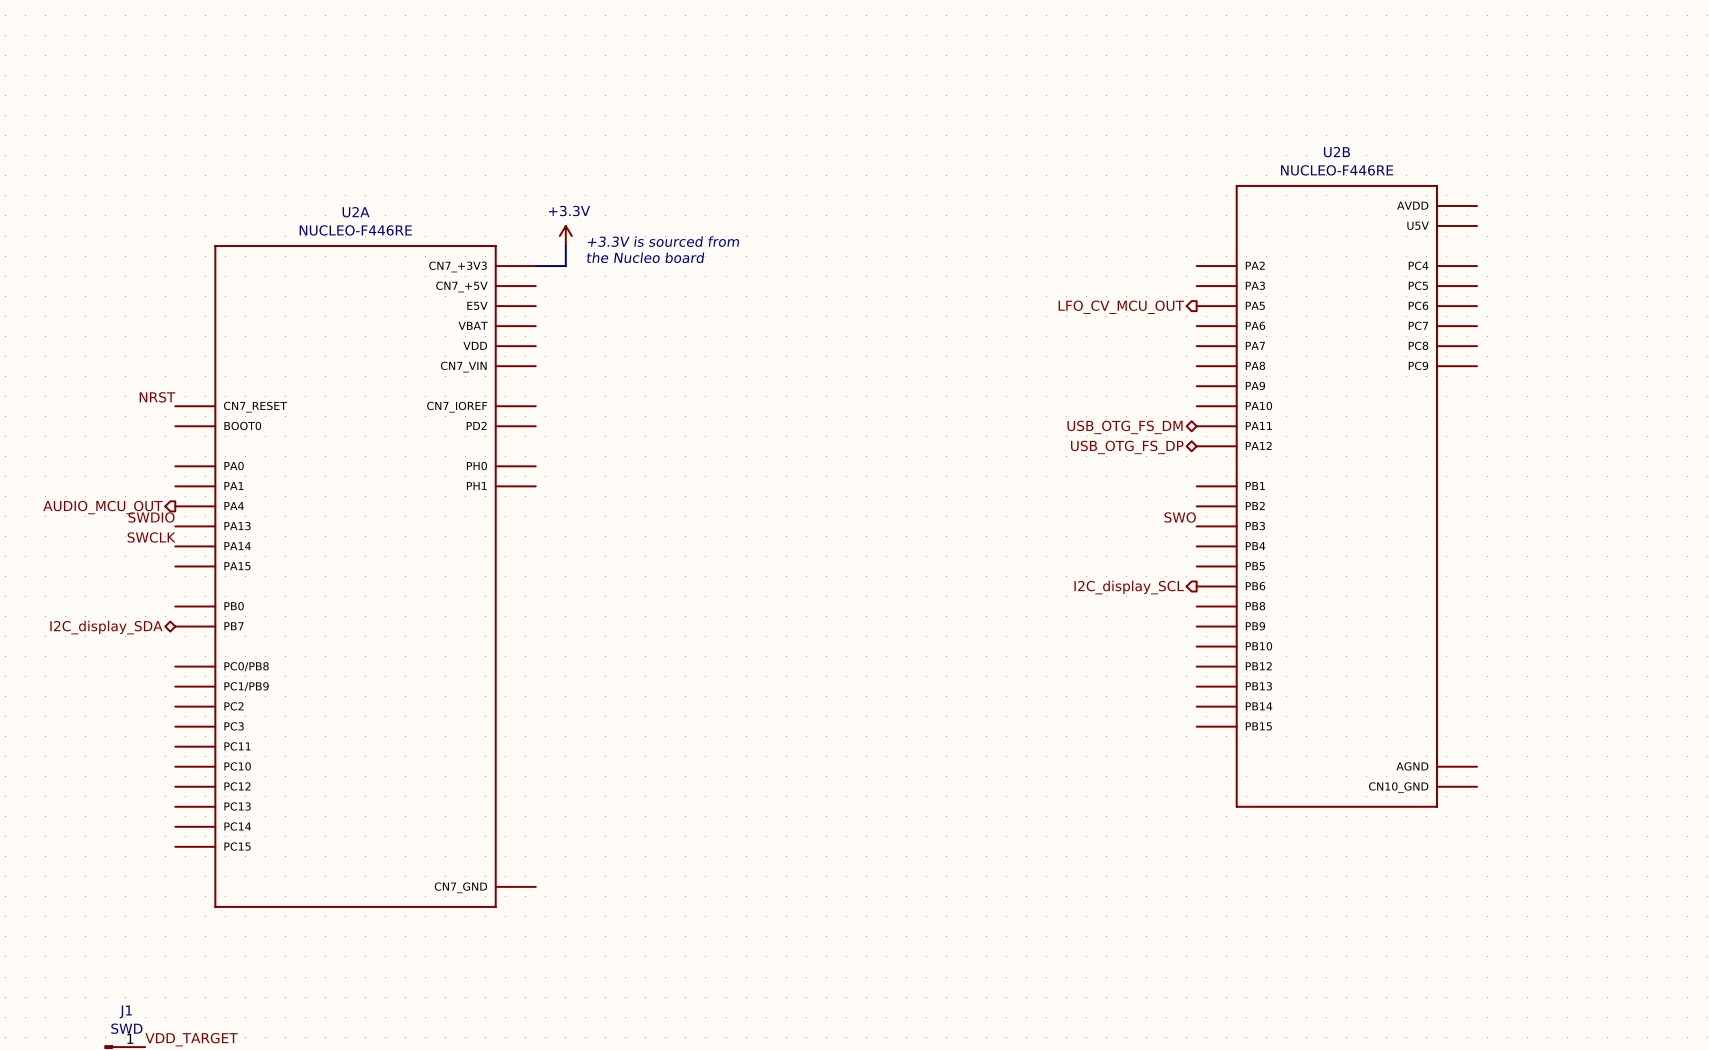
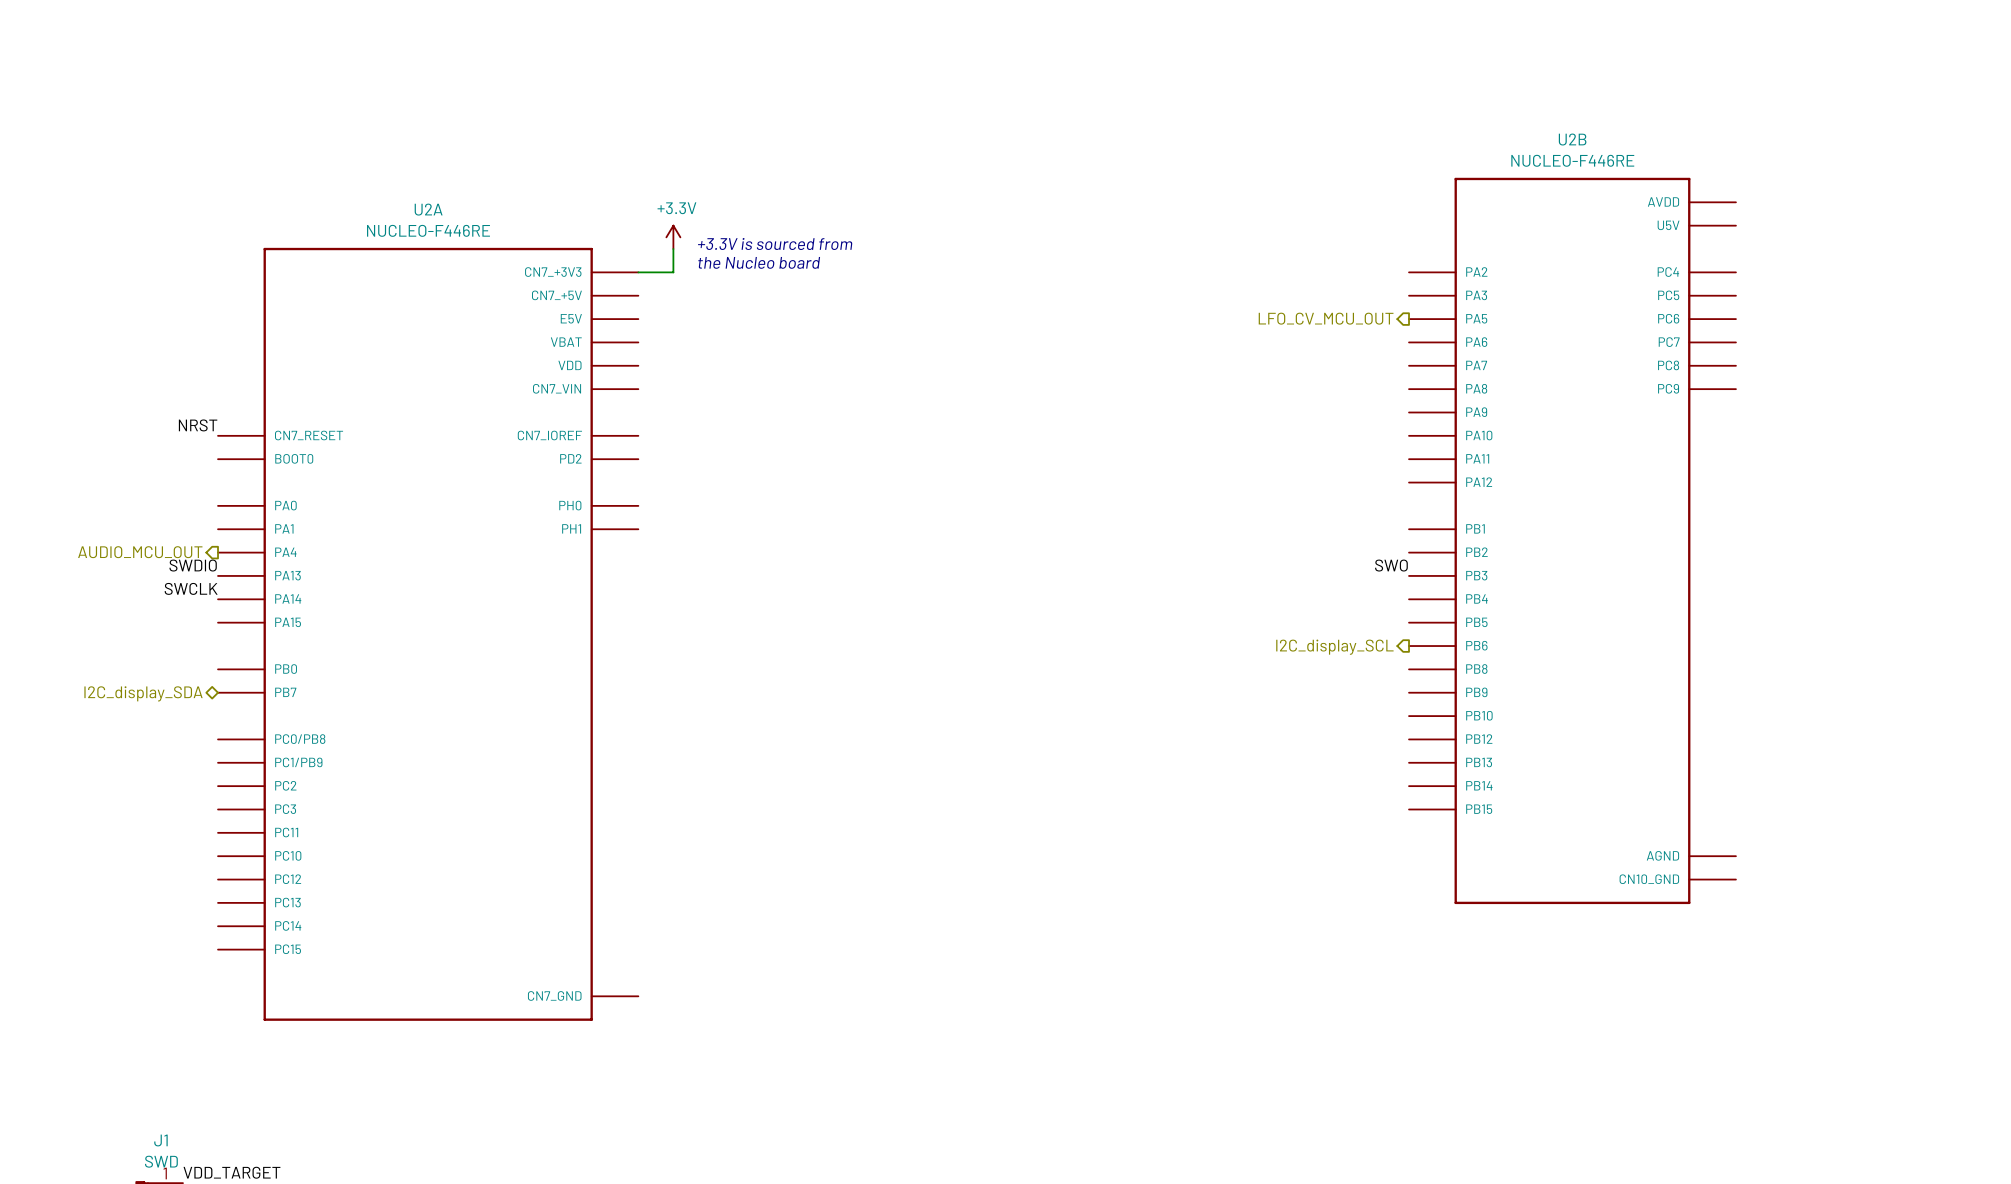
hierarchical label: USB_OTG_FS_DM (1125, 427) -> none
hierarchical label: USB_OTG_FS_DP (1127, 447) -> none

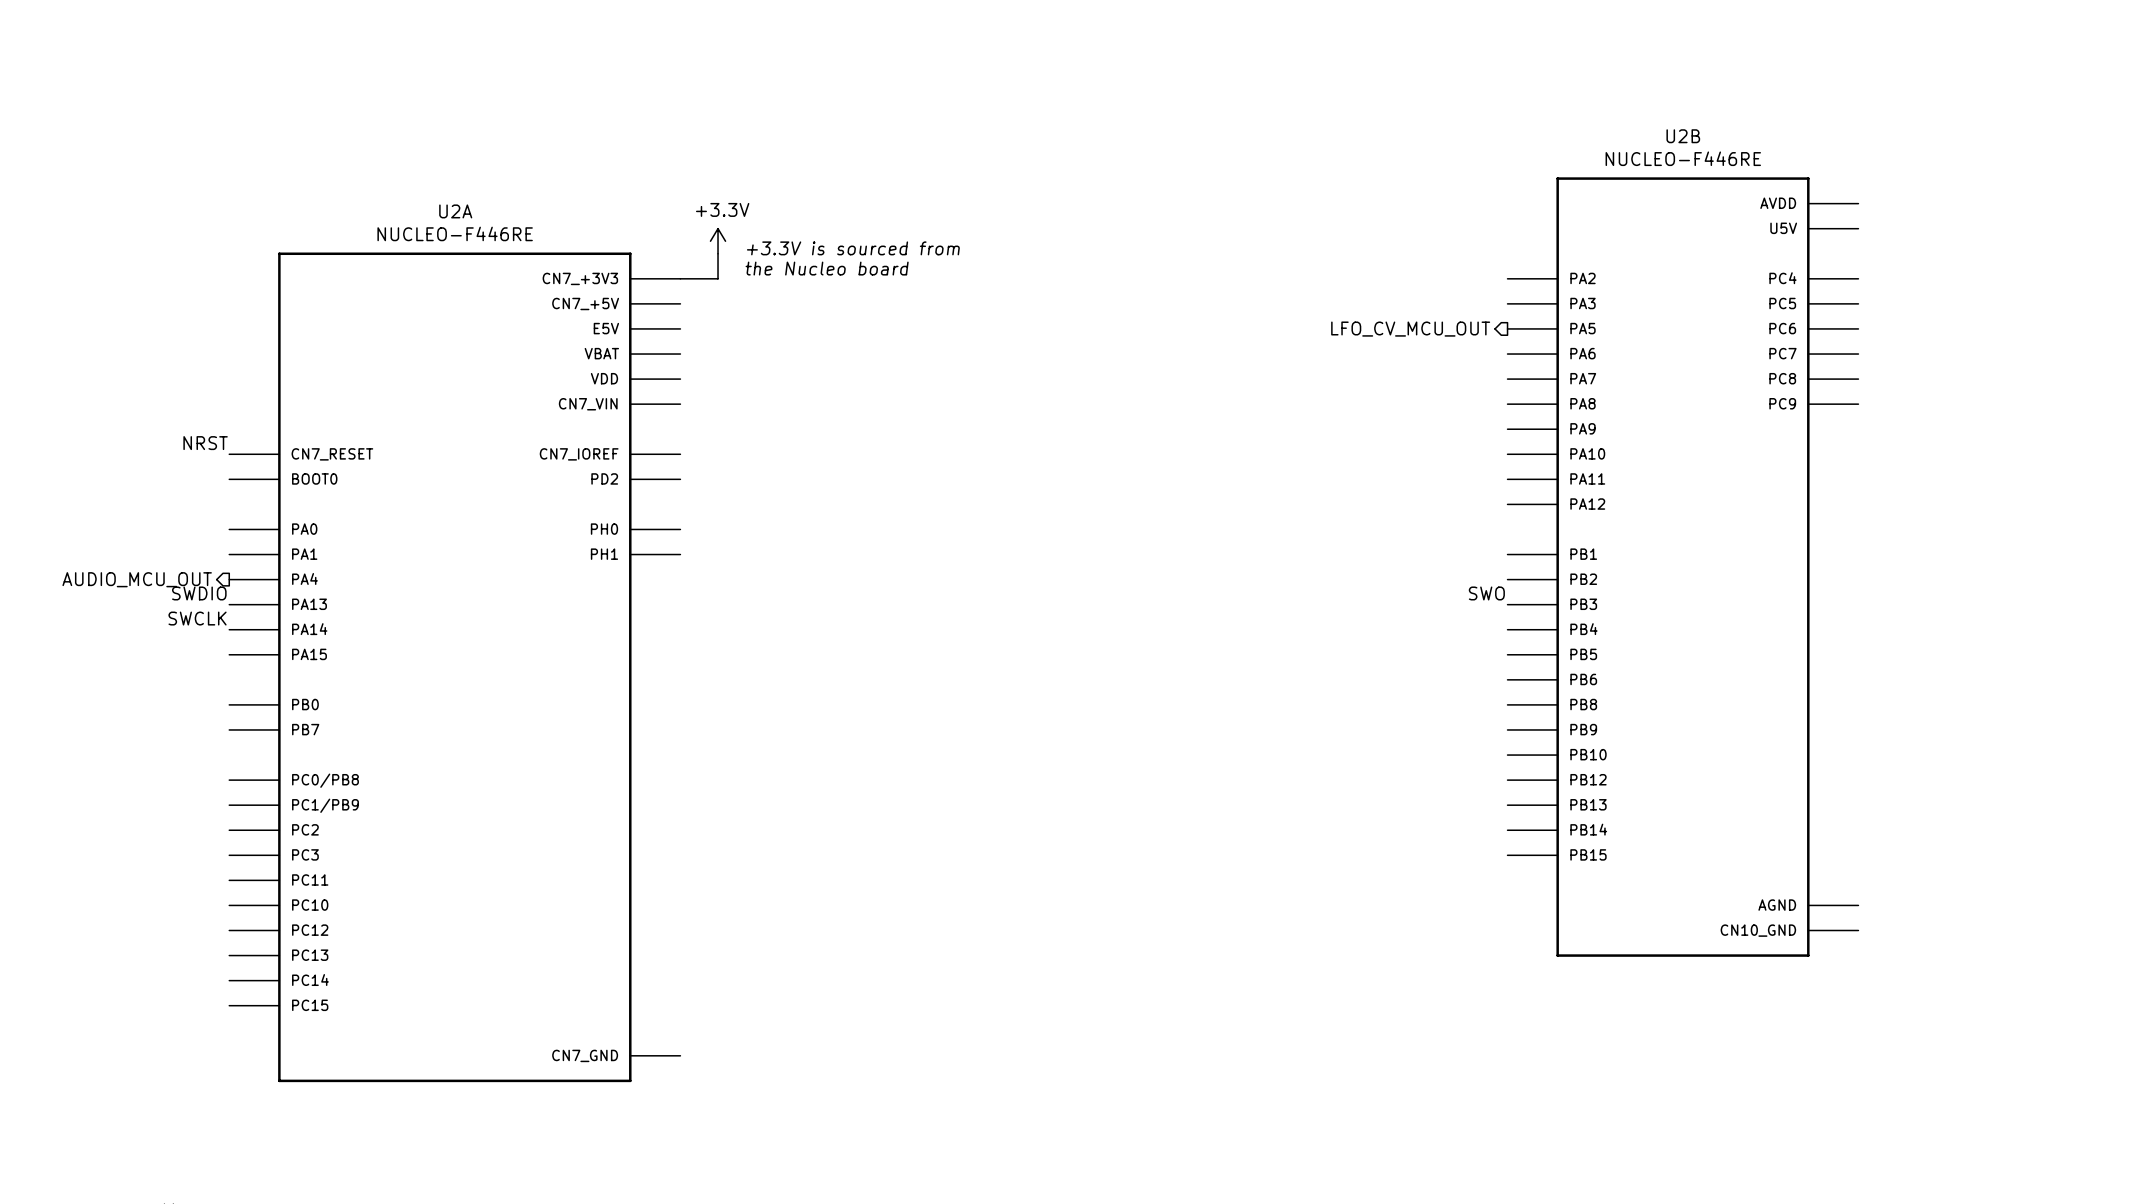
hierarchical label: I2C_display_SCL (1334, 647) -> none
hierarchical label: I2C_display_SDA (143, 693) -> none

